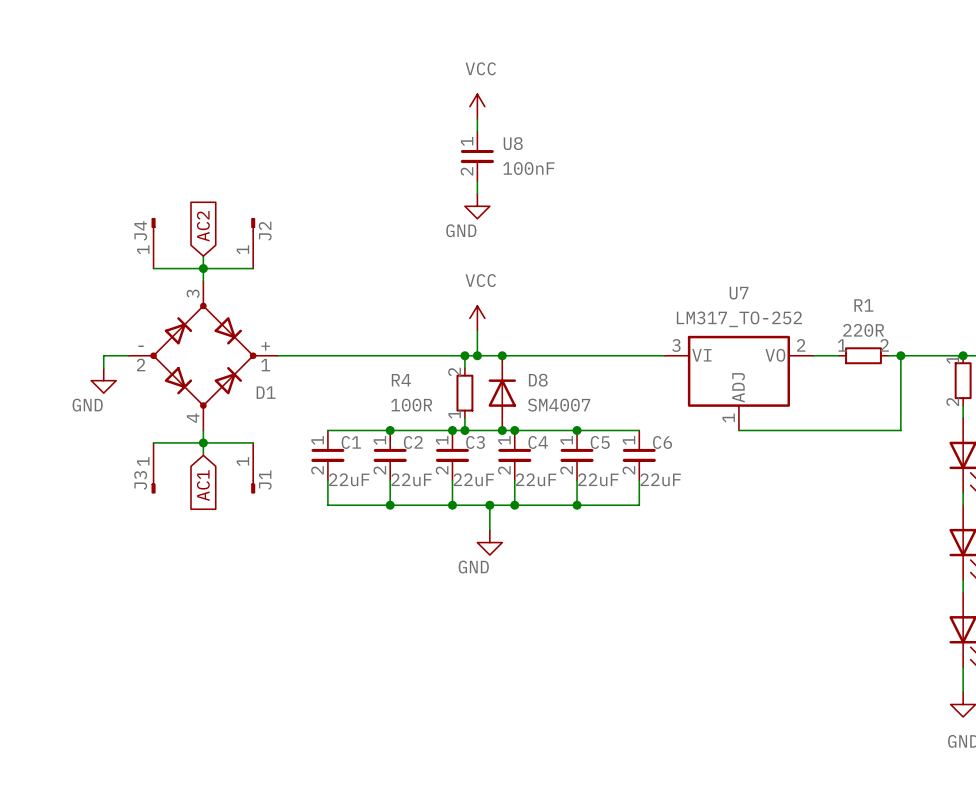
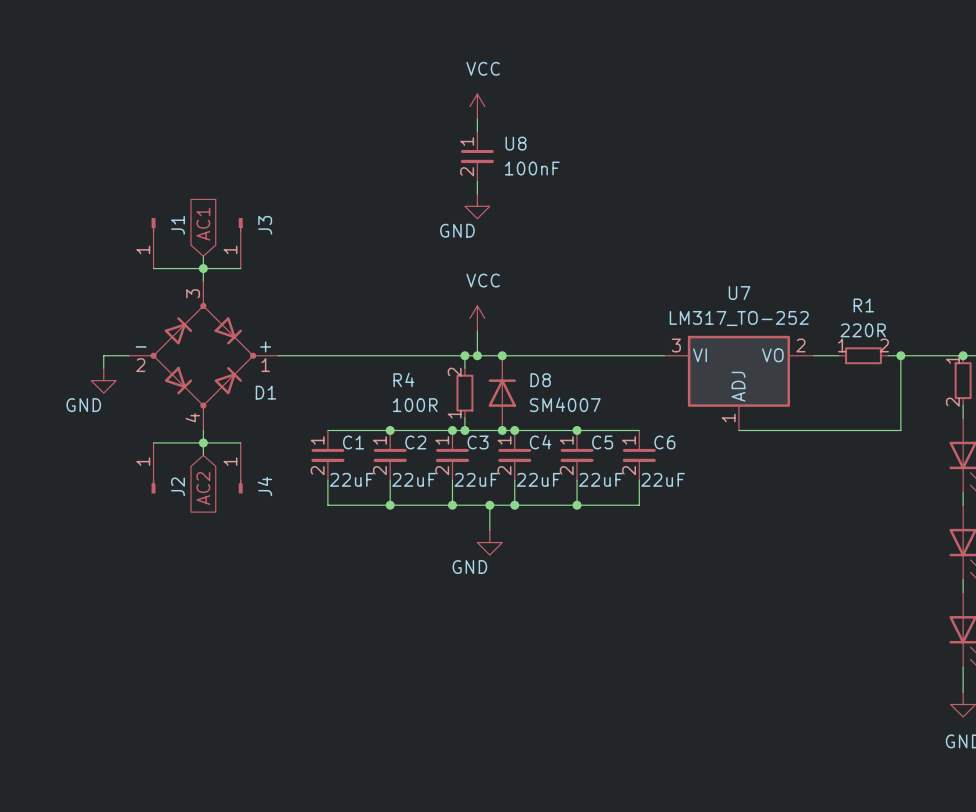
global label: AC2 (203, 226) -> AC1 (203, 224)
J4 name: J4 (140, 230) -> J1 (177, 225)
J3: none -> (240, 243)
J2: (253, 243) -> none
wire: (240, 268) (253, 268) -> none
wire: (240, 442) (253, 442) -> none
J4: none -> (240, 468)
J1: (253, 468) -> none
J3 name: J3 (140, 480) -> J2 (177, 486)
global label: AC1 (203, 485) -> AC2 (203, 488)

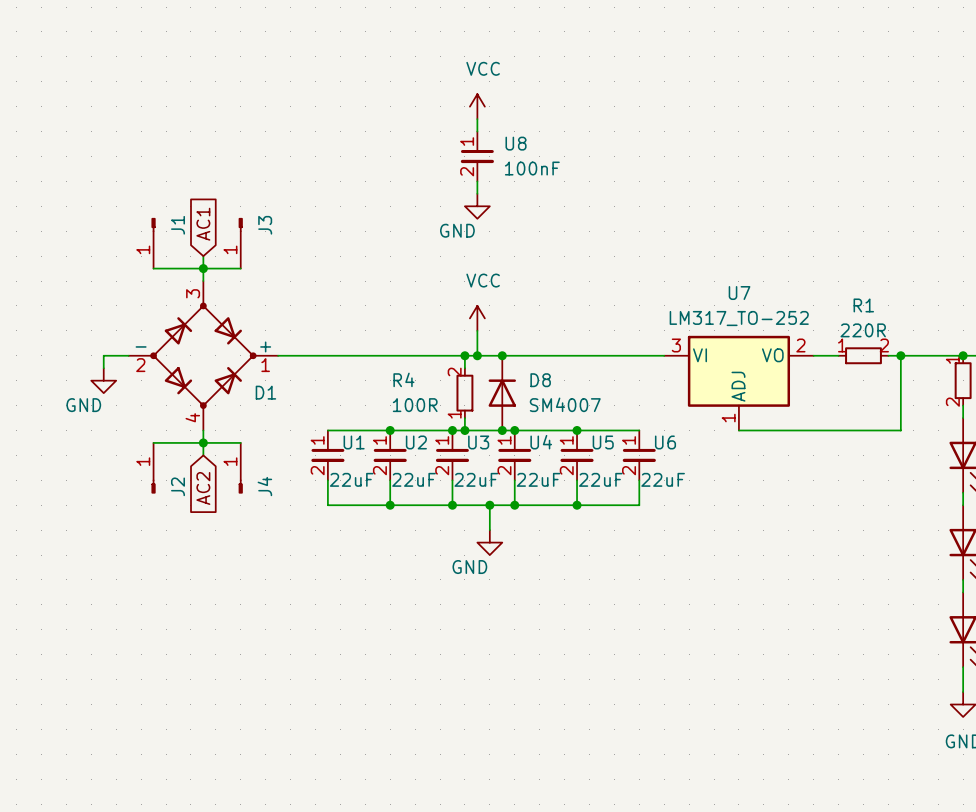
C1 name: C1 (353, 442) -> U1 (354, 442)
C2 name: C2 (415, 442) -> U2 (416, 442)
C3 name: C3 (478, 442) -> U3 (478, 442)
C4 name: C4 (540, 442) -> U4 (541, 442)
C5 name: C5 (602, 442) -> U5 (603, 442)
C6 name: C6 (664, 442) -> U6 (665, 442)

